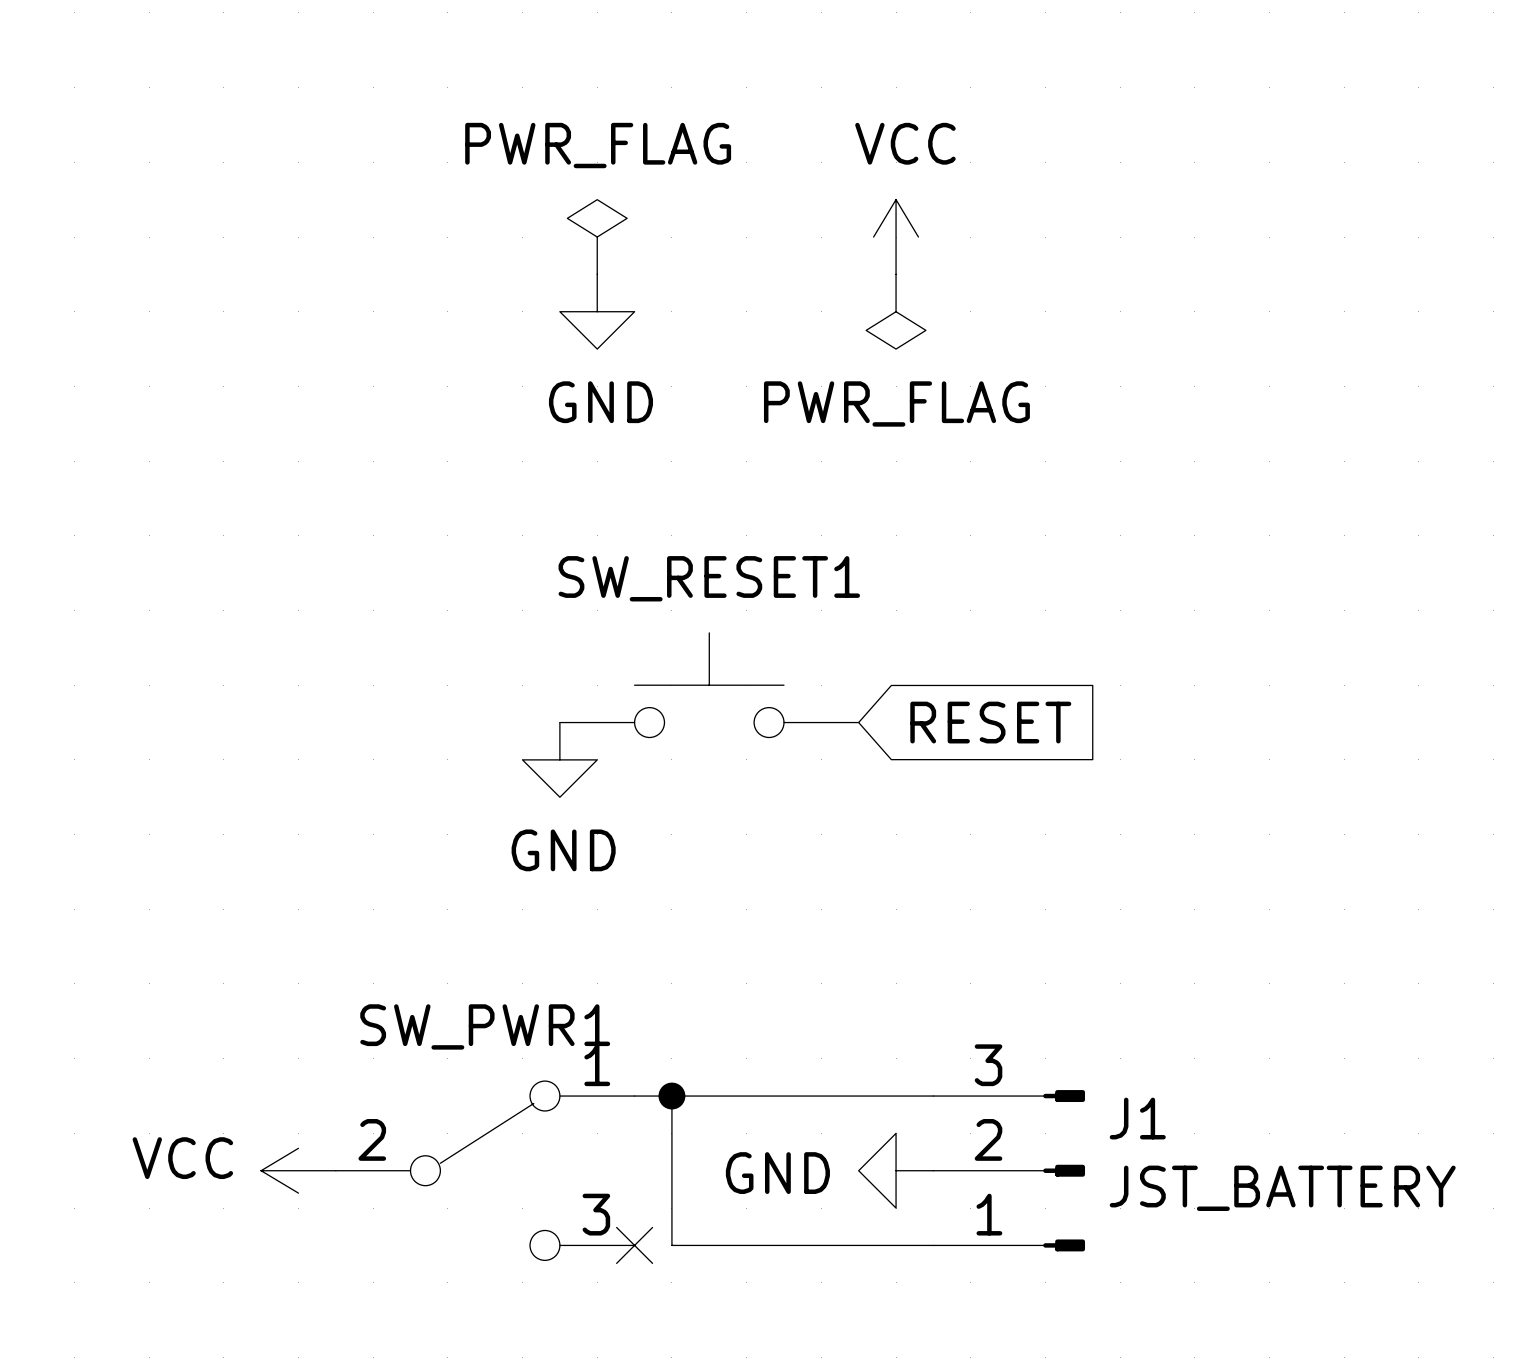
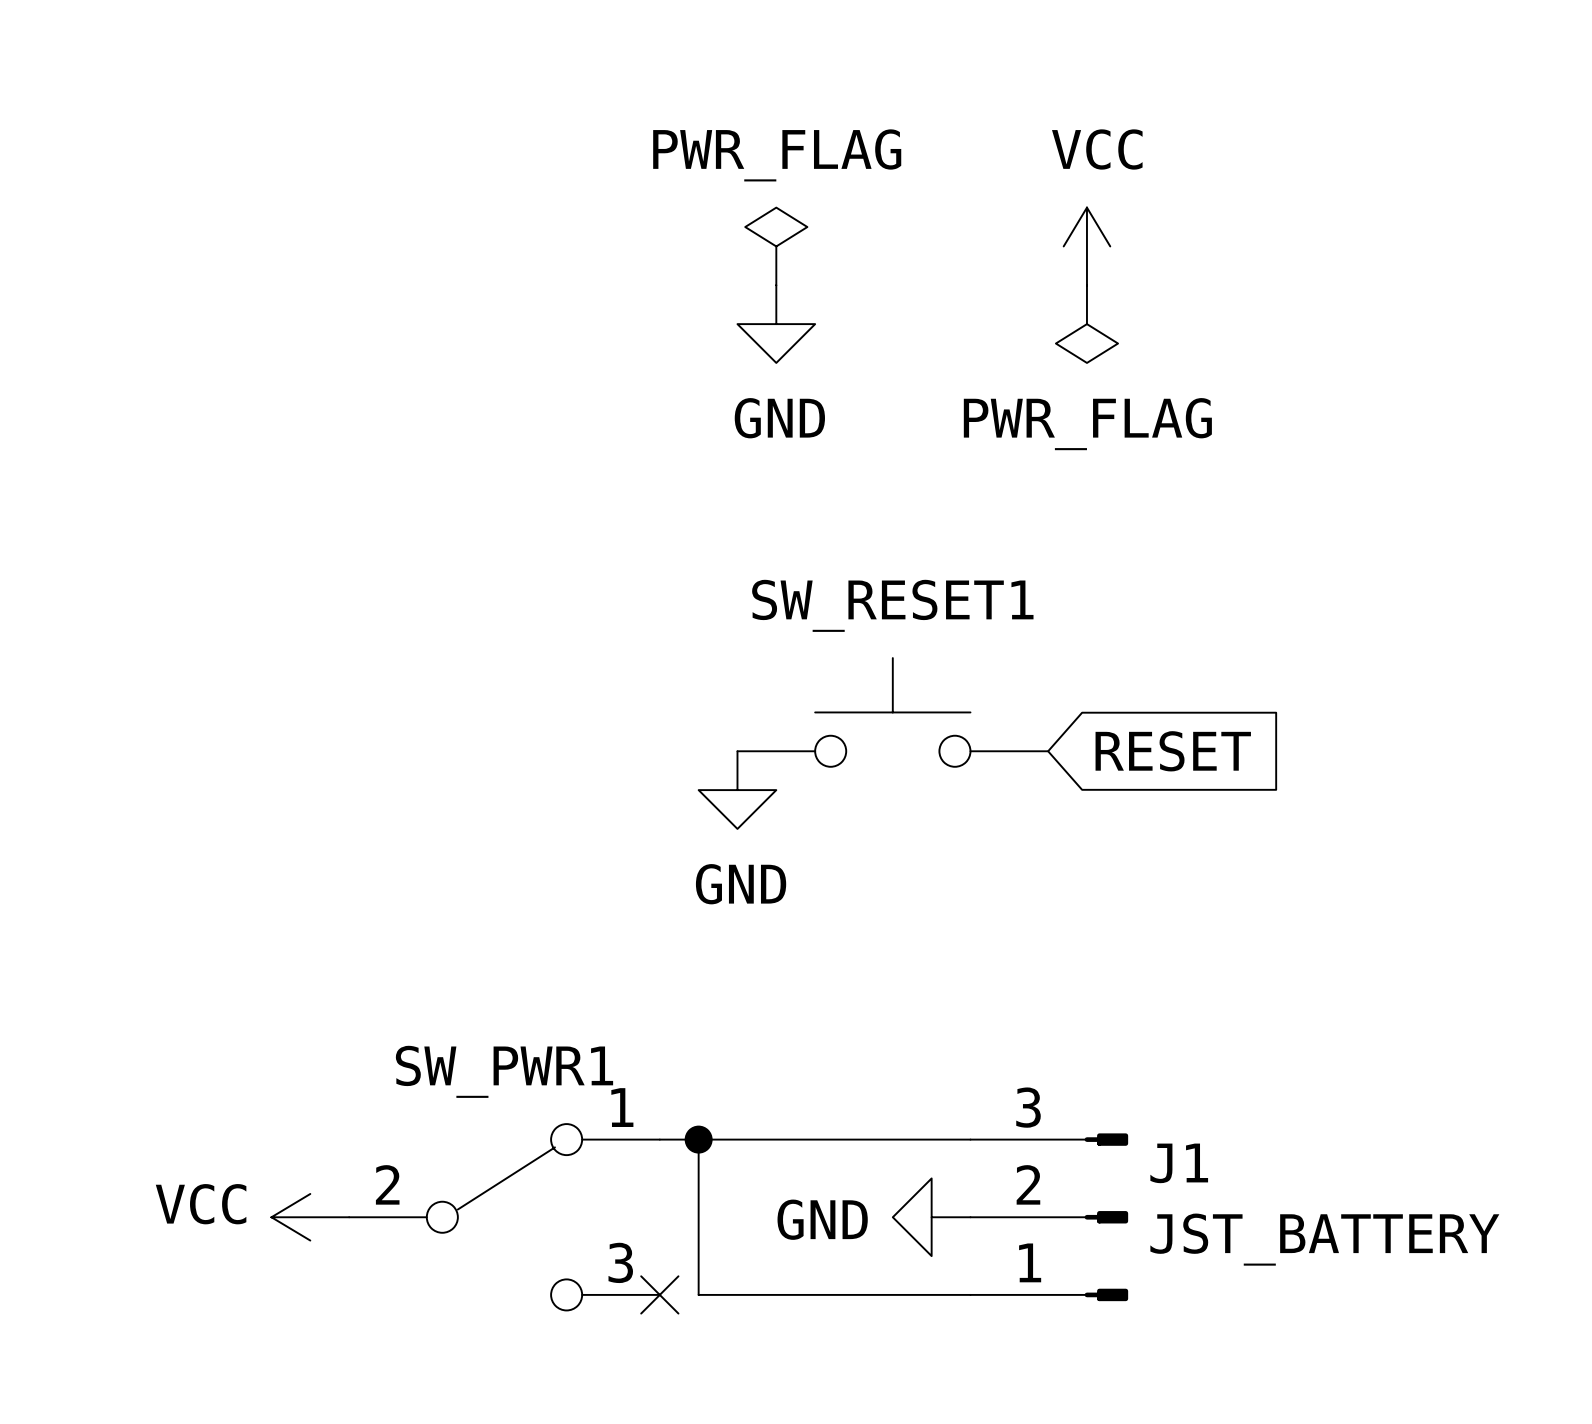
power symbol: PWR_FLAG (597, 237) -> none
power symbol: none -> PWR_FLAG (776, 246)
power symbol position: VCC (896, 237) -> VCC (1086, 246)
power symbol position: GND (597, 311) -> GND (776, 324)
power symbol: PWR_FLAG (896, 311) -> none
power symbol: none -> PWR_FLAG (1086, 324)
SW_RESET1 position: (709, 685) -> (892, 712)
global label position: RESET (990, 722) -> RESET (1173, 751)
power symbol position: GND (559, 759) -> GND (737, 790)

